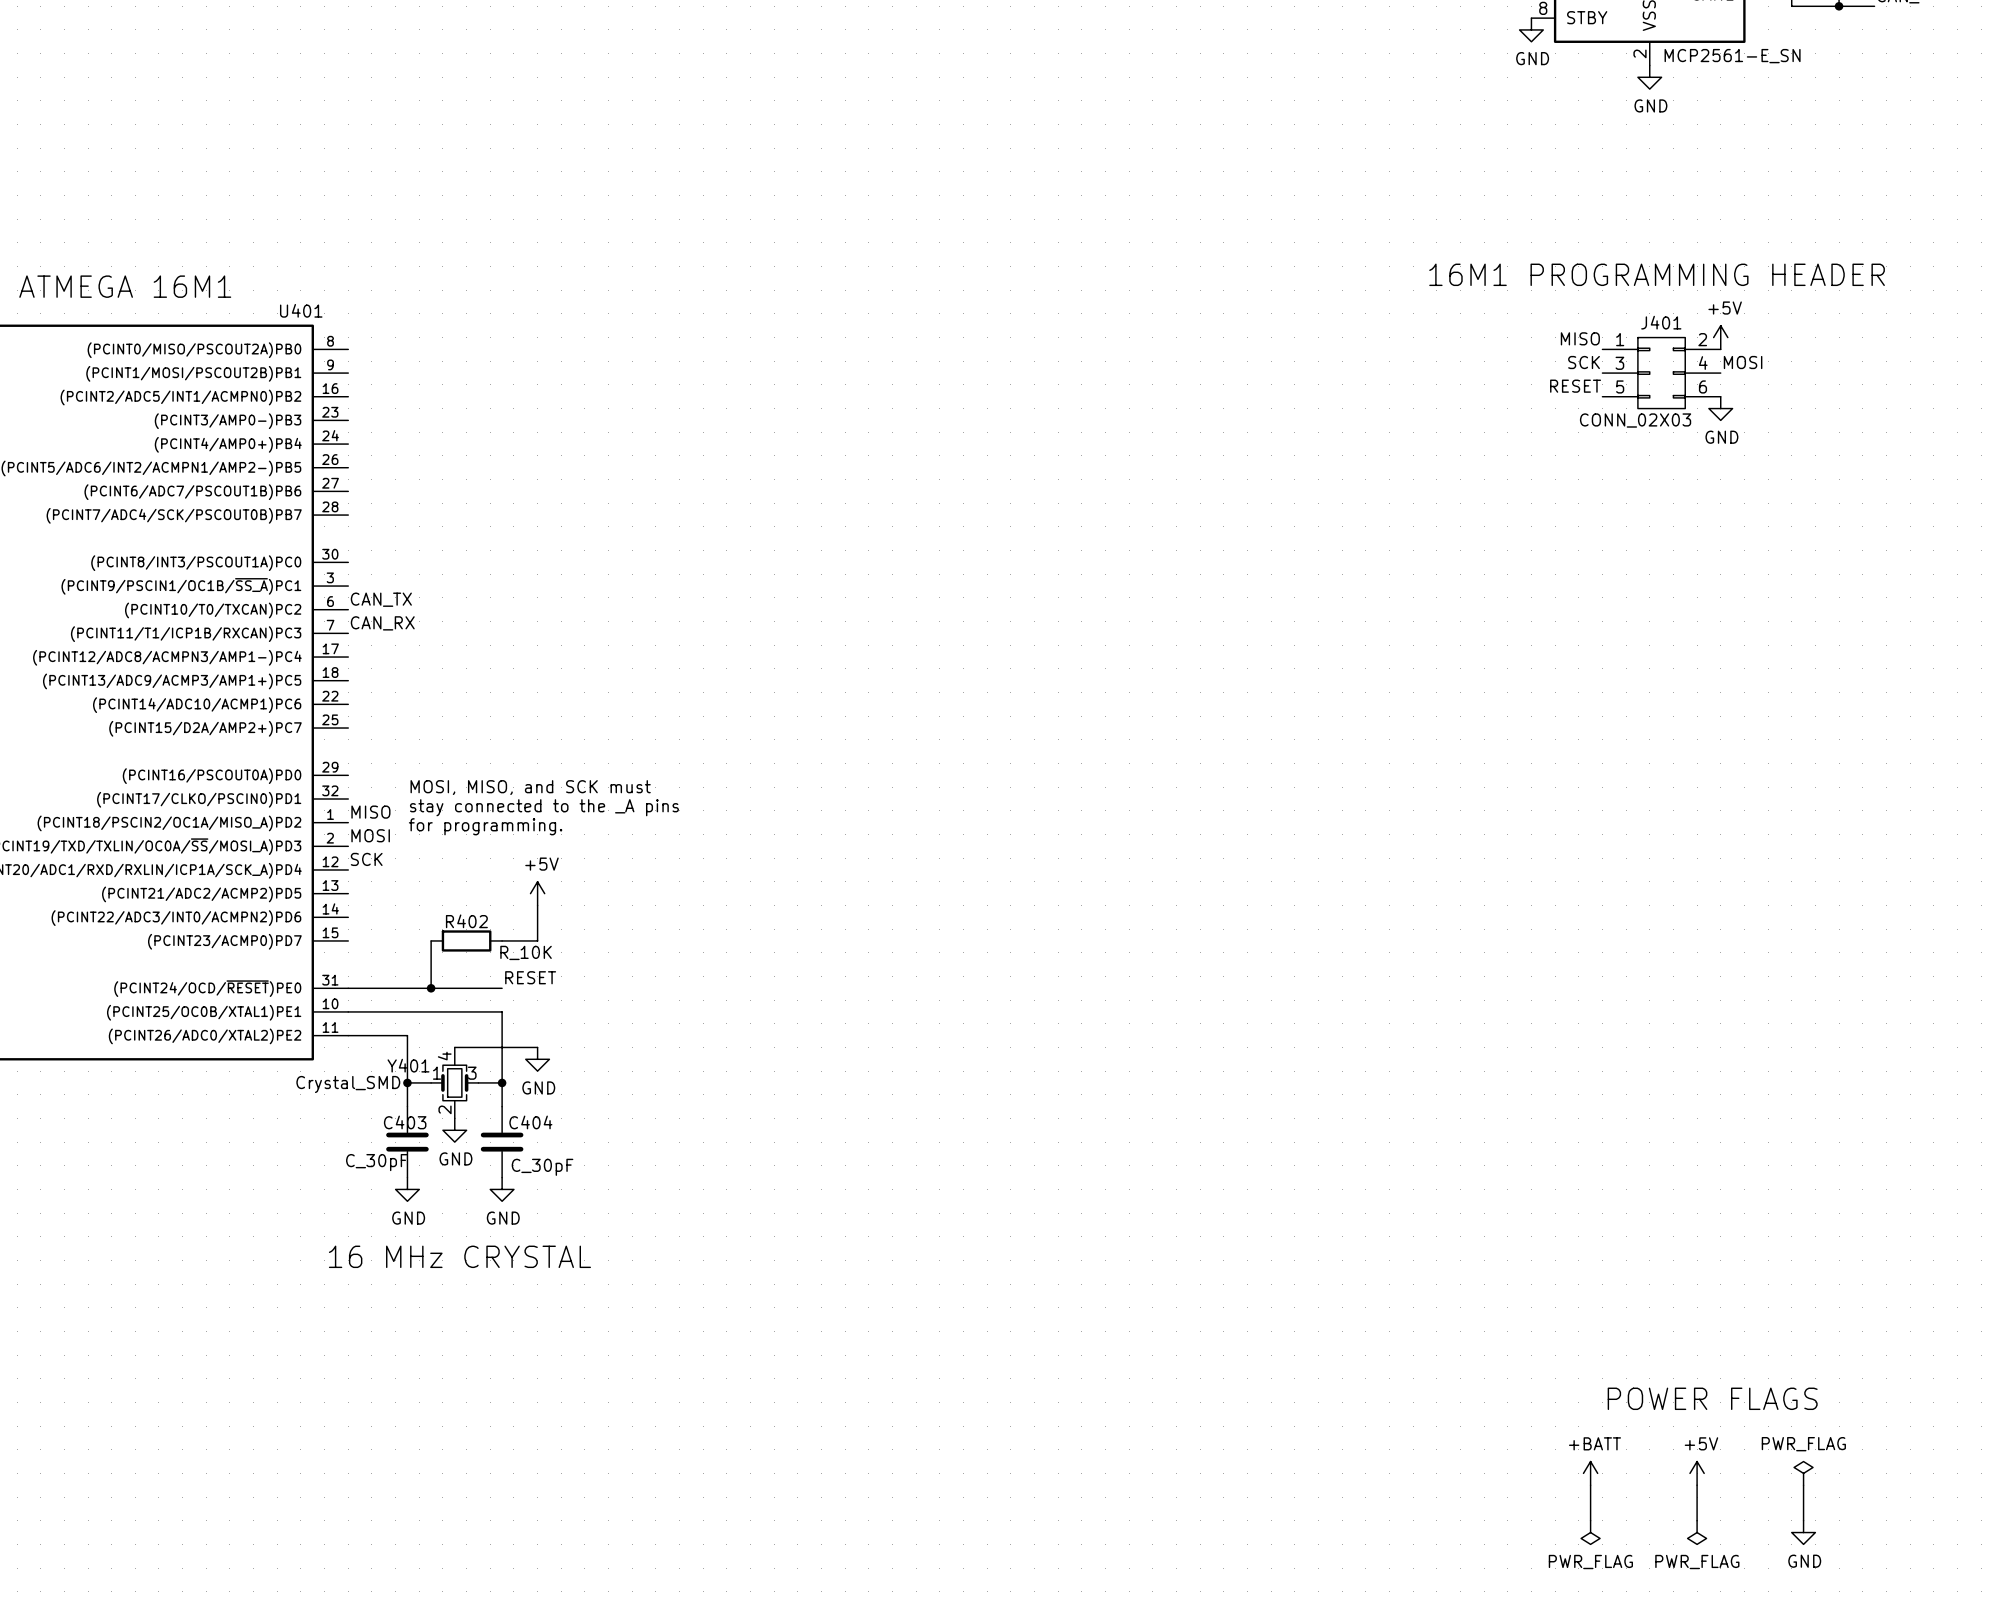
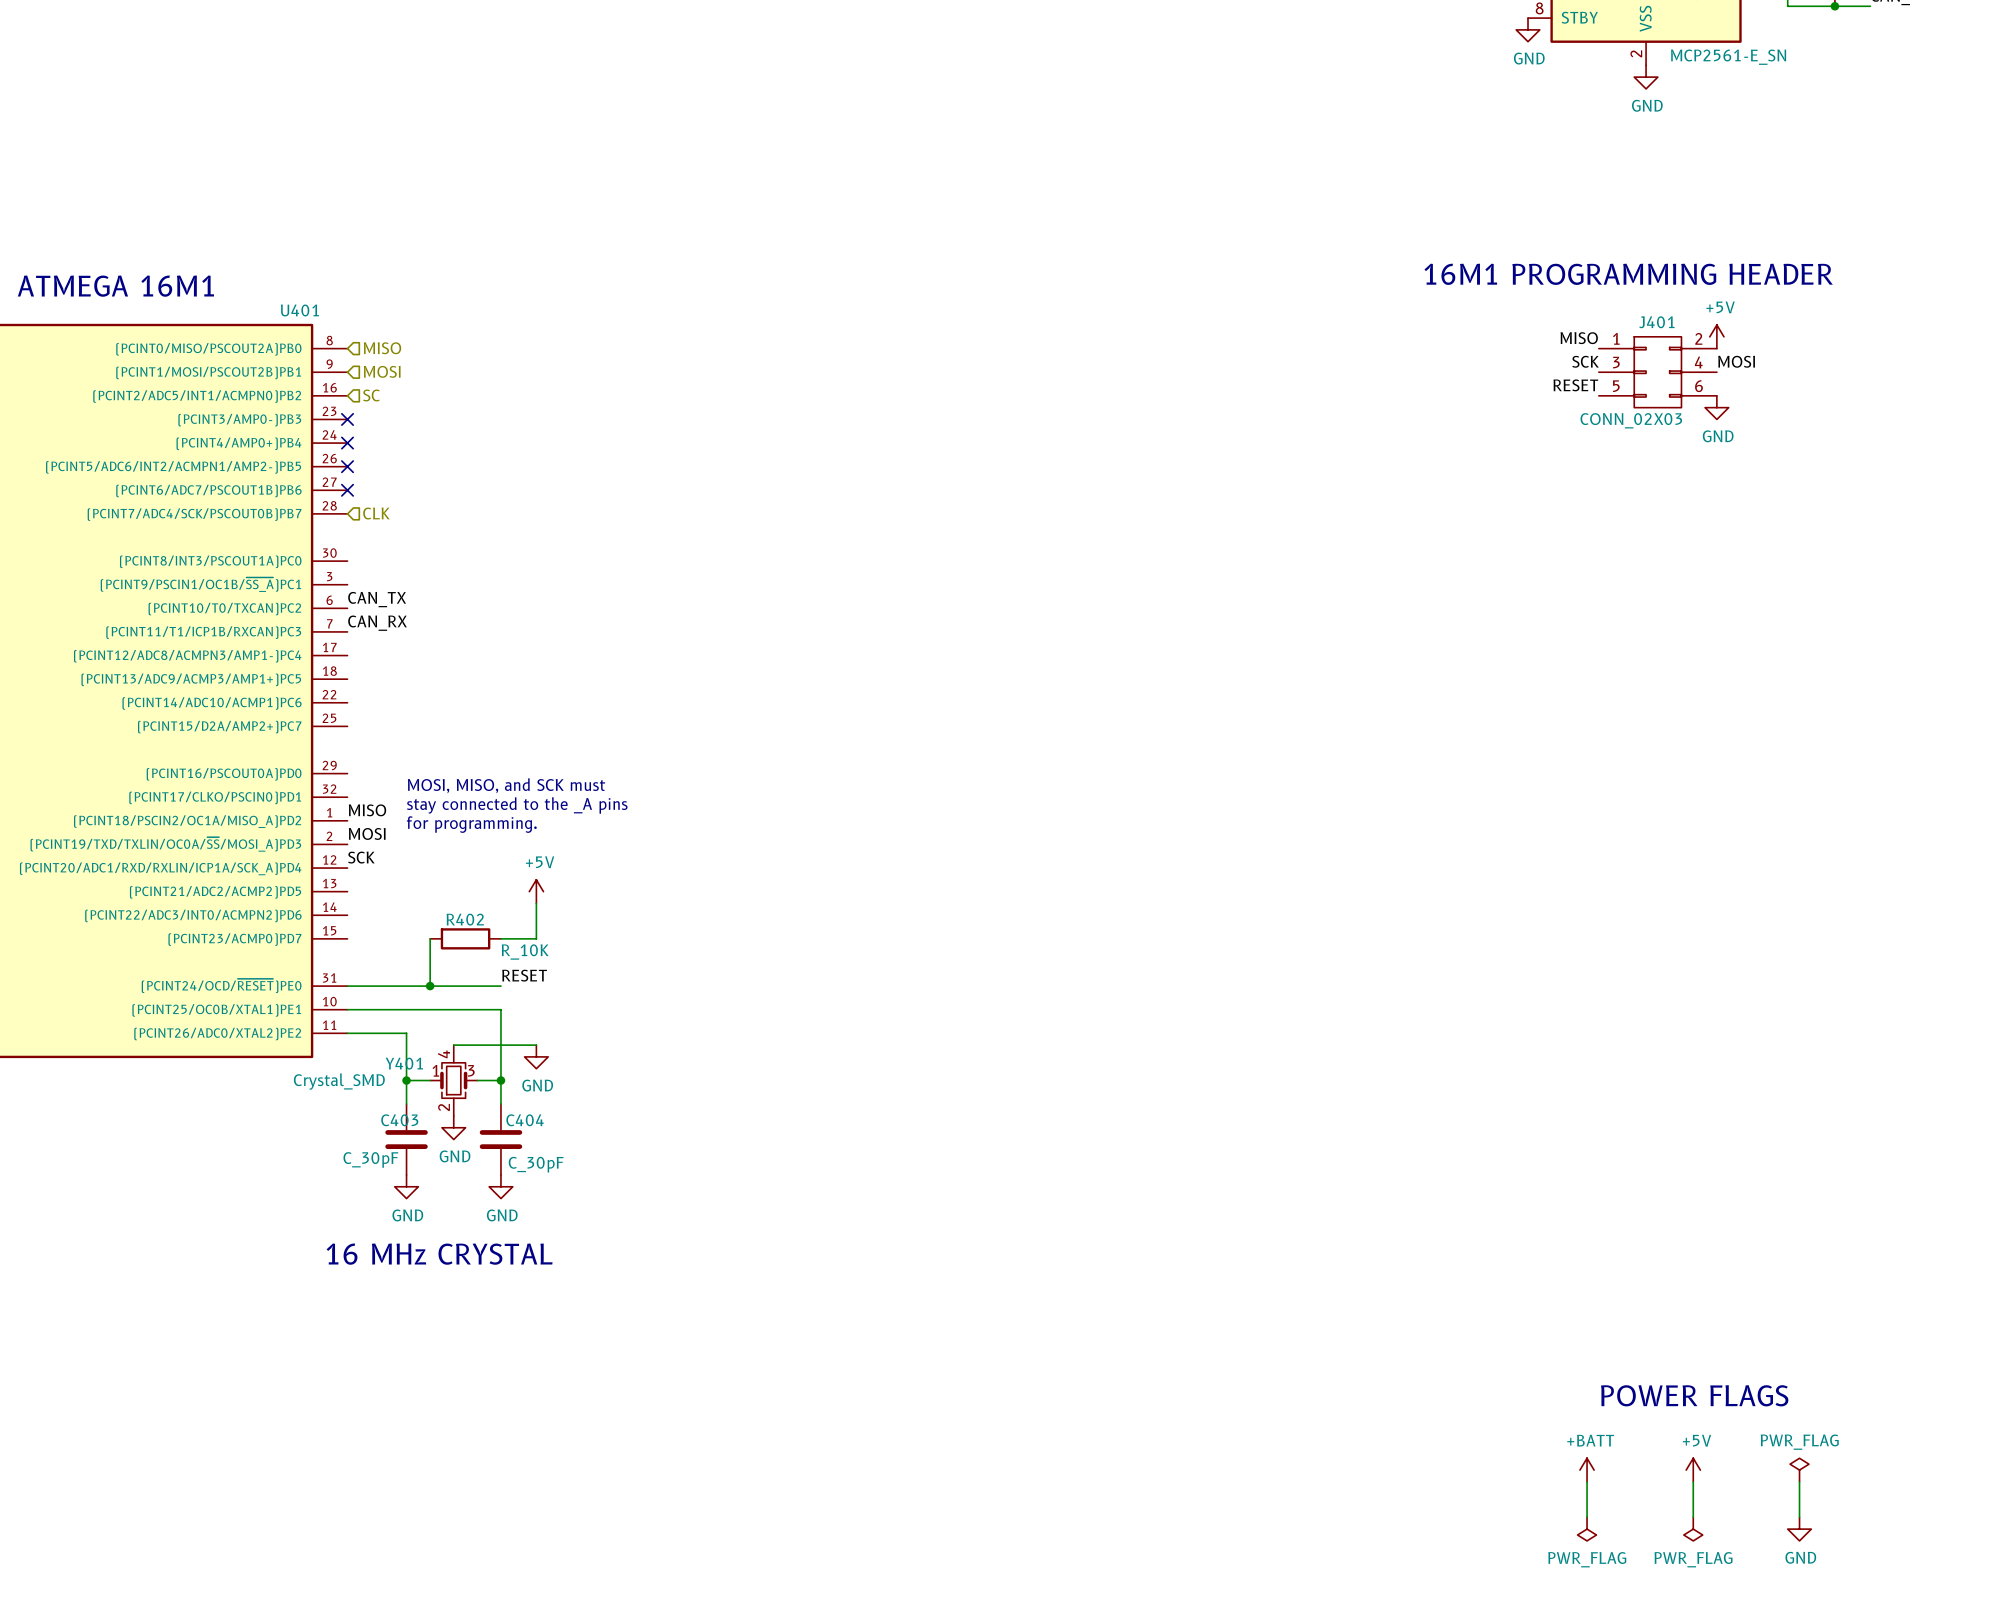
hierarchical label: none -> MISO (382, 348)
hierarchical label: none -> MOSI (382, 371)
hierarchical label: none -> SC (371, 395)
no-connect mark: none -> (347, 419)
no-connect mark: none -> (347, 443)
no-connect mark: none -> (347, 466)
no-connect mark: none -> (347, 490)
hierarchical label: none -> CLK (376, 513)

